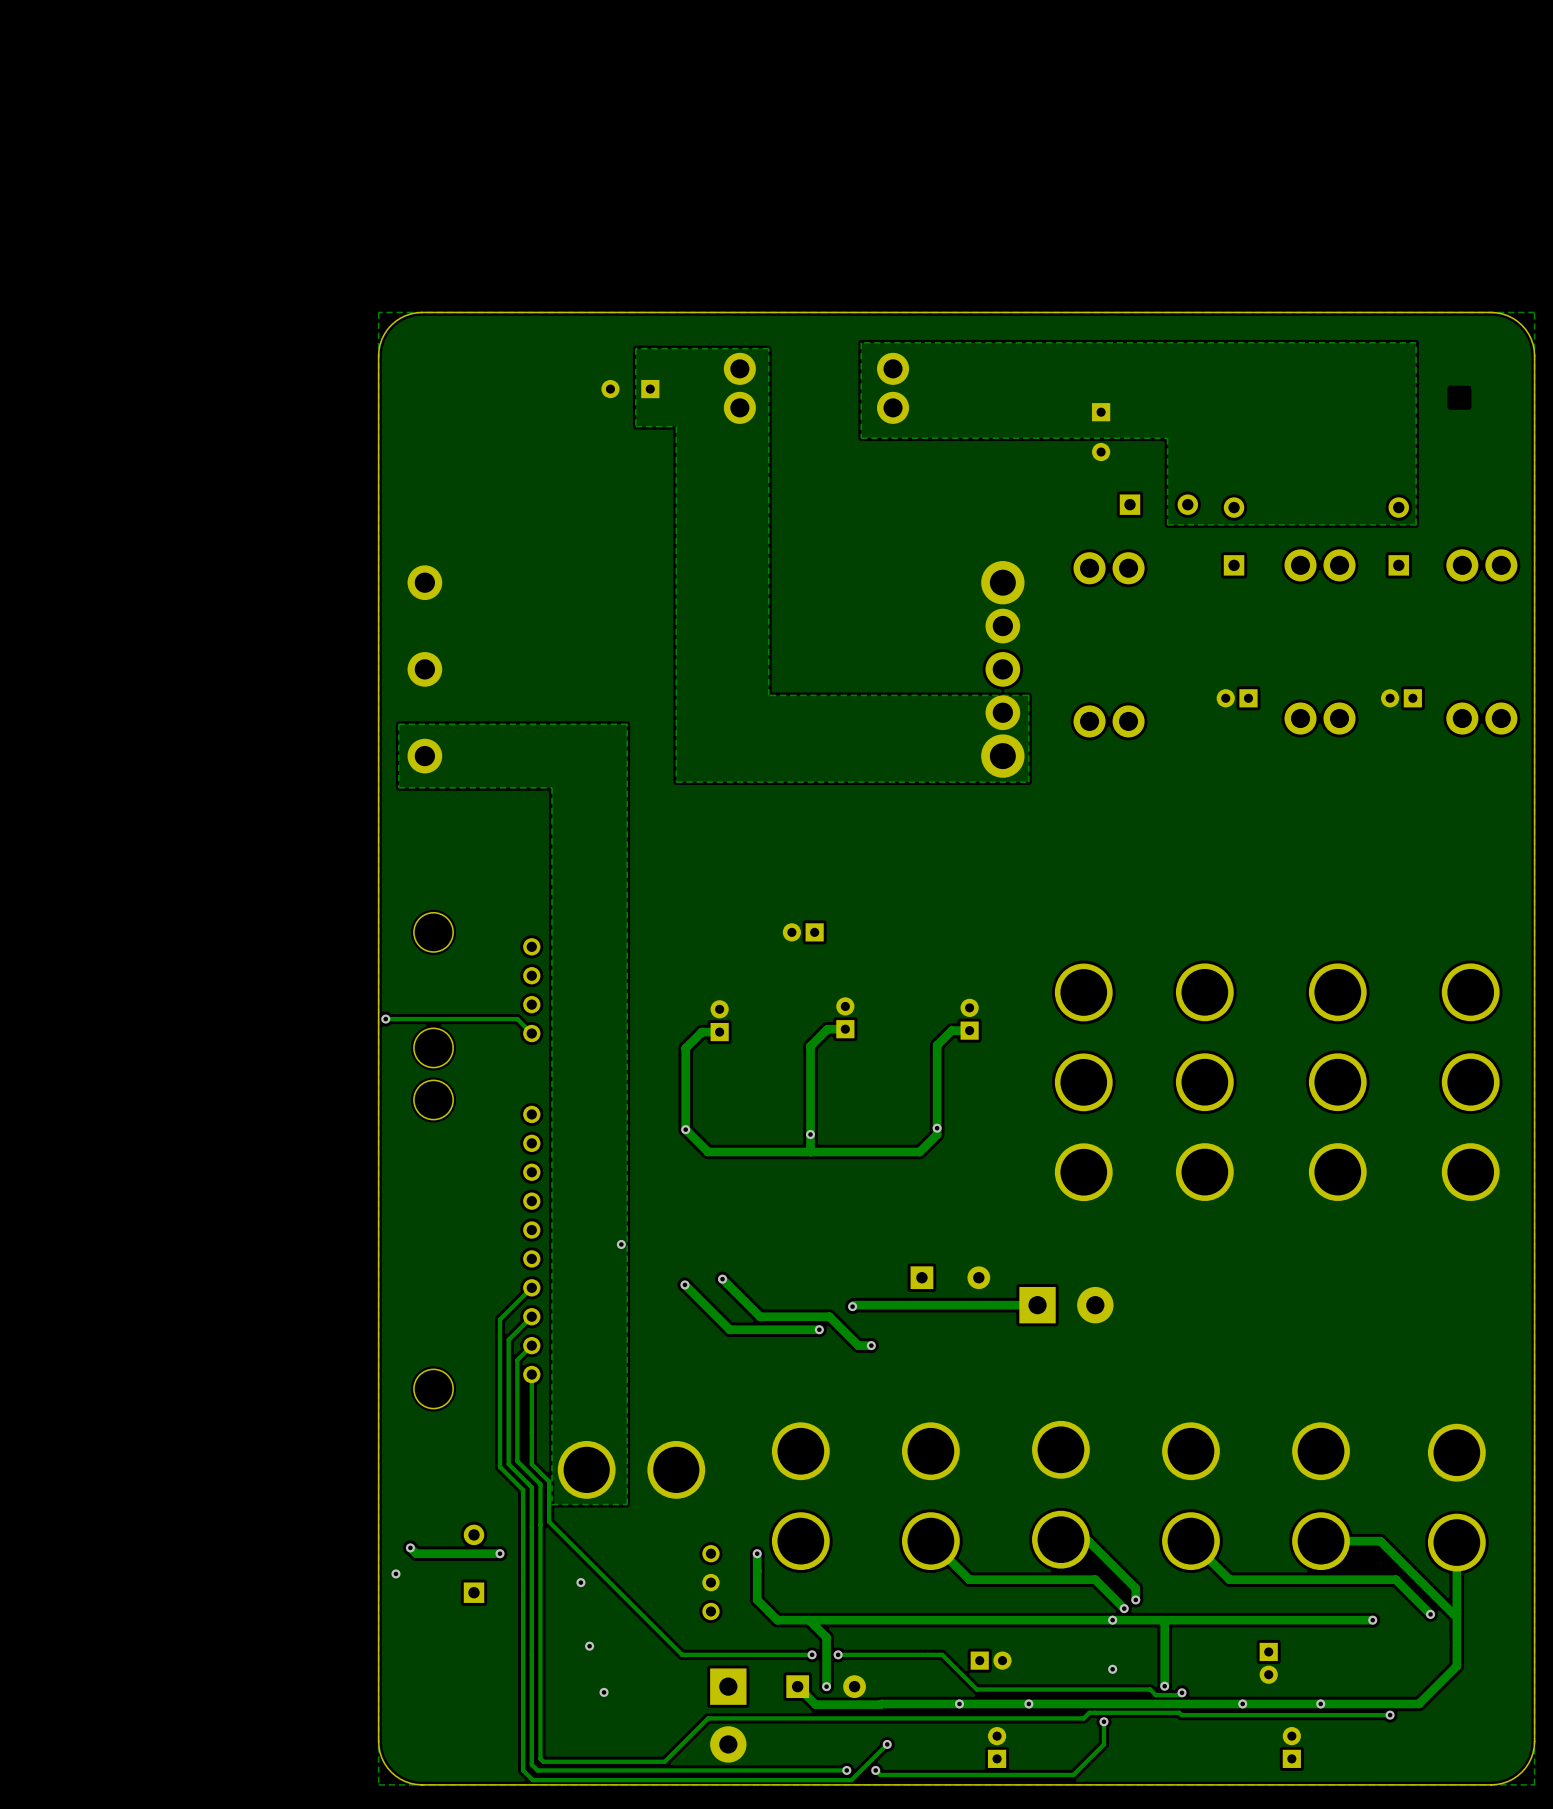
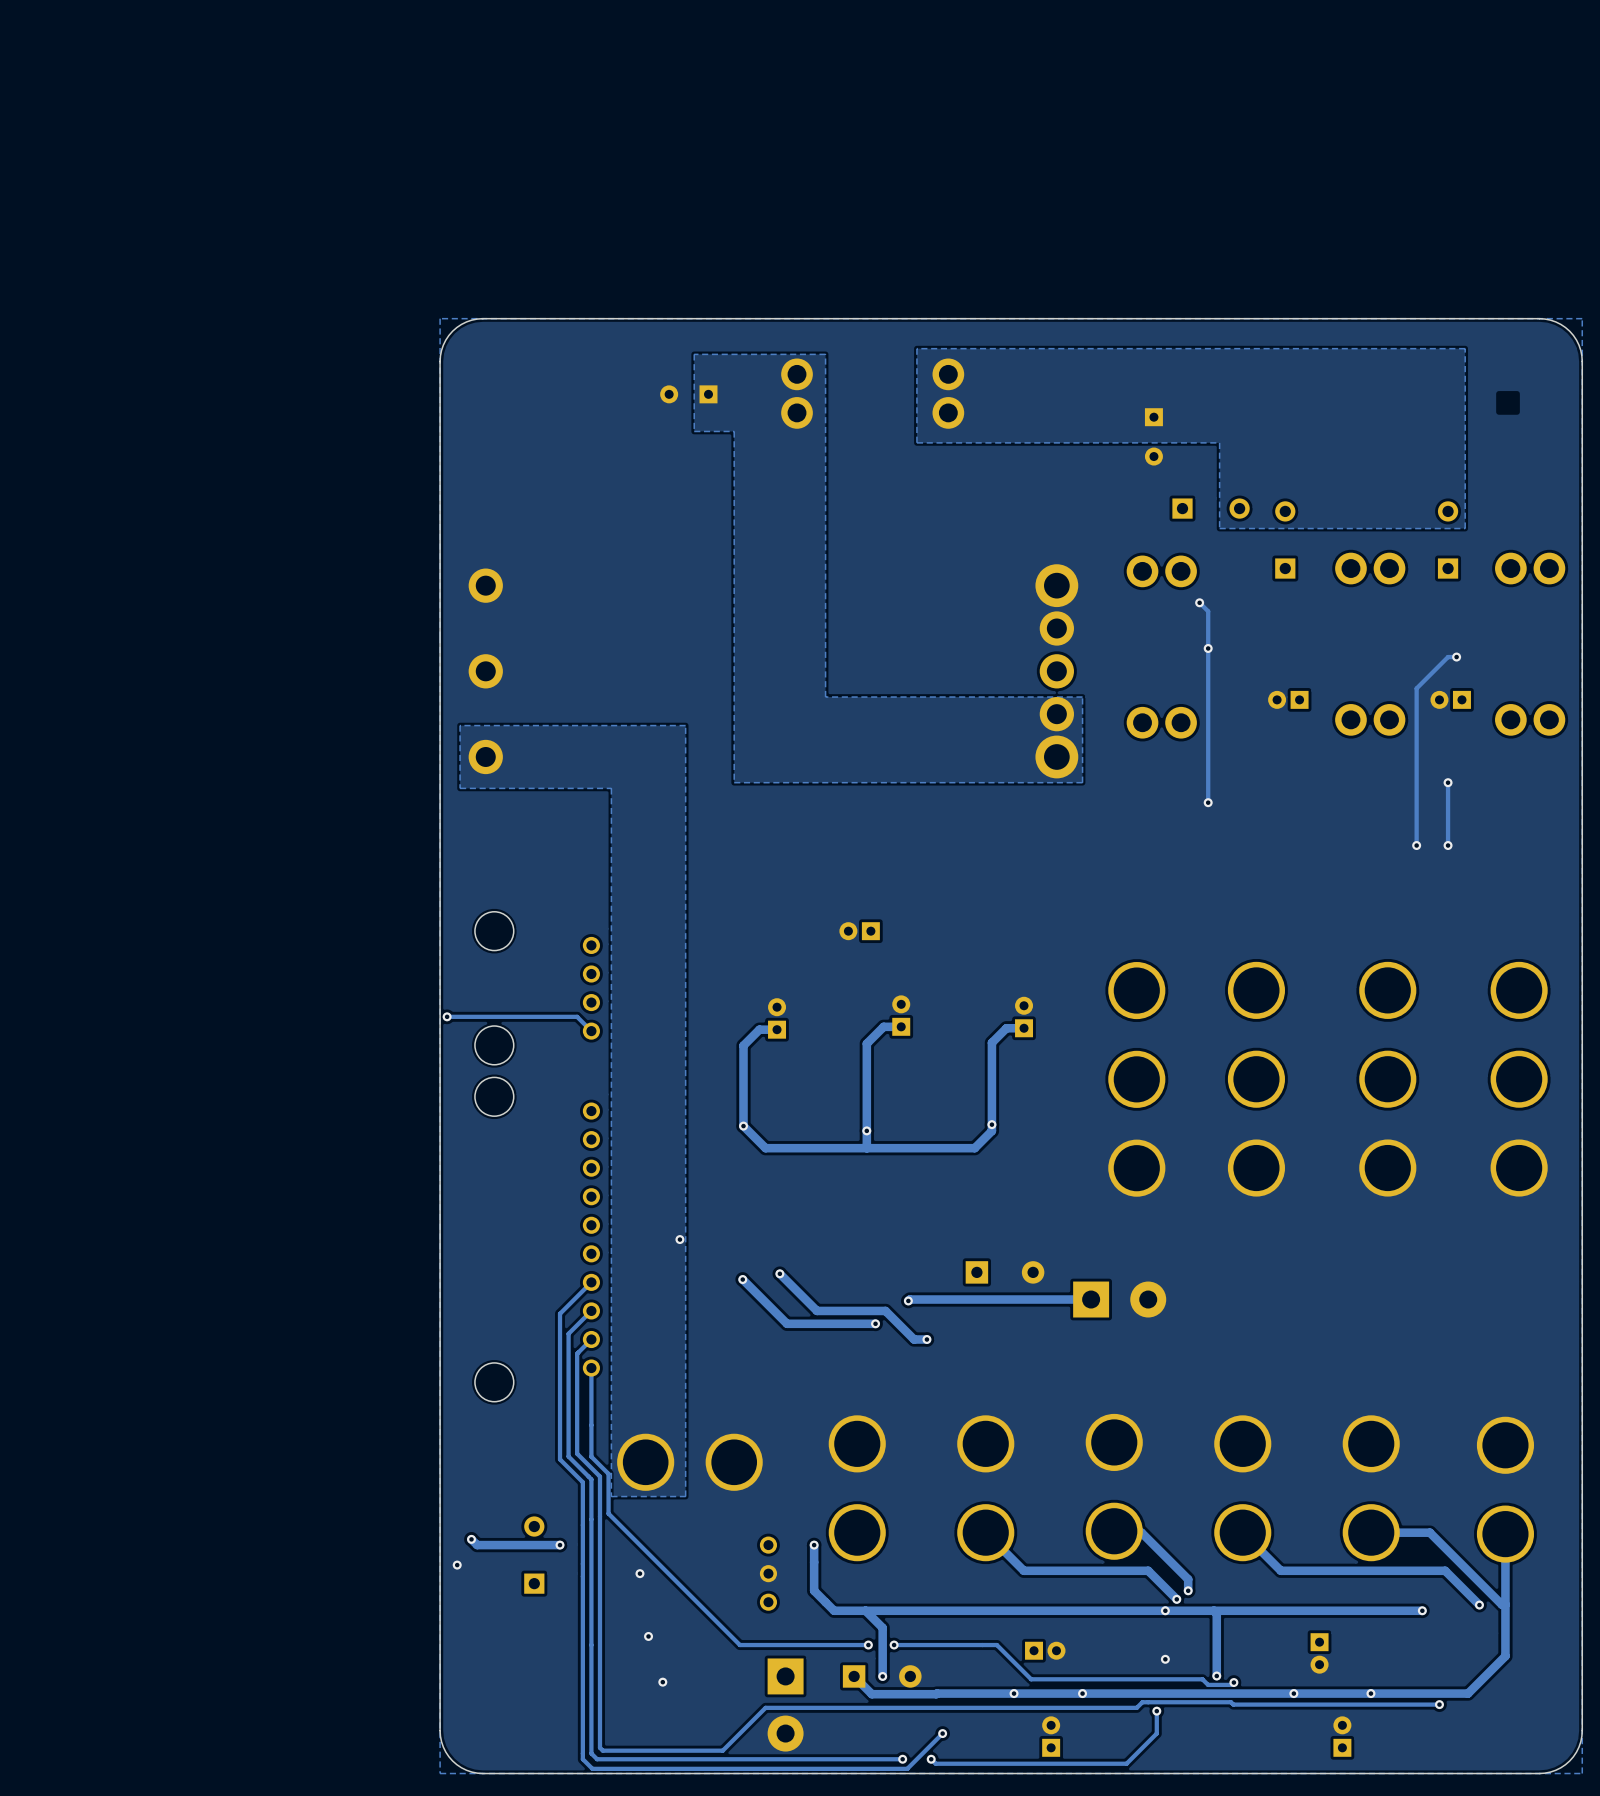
track: none -> (1199, 602) (1208, 611) (1208, 802)
via: none -> (1199, 602)
via: none -> (1208, 648)
track: none -> (1456, 657) (1448, 657) (1416, 688) (1416, 845)
via: none -> (1456, 657)
track: none -> (1448, 782) (1448, 845)
via: none -> (1448, 782)
via: none -> (1208, 802)
via: none -> (1416, 845)
via: none -> (1448, 845)

